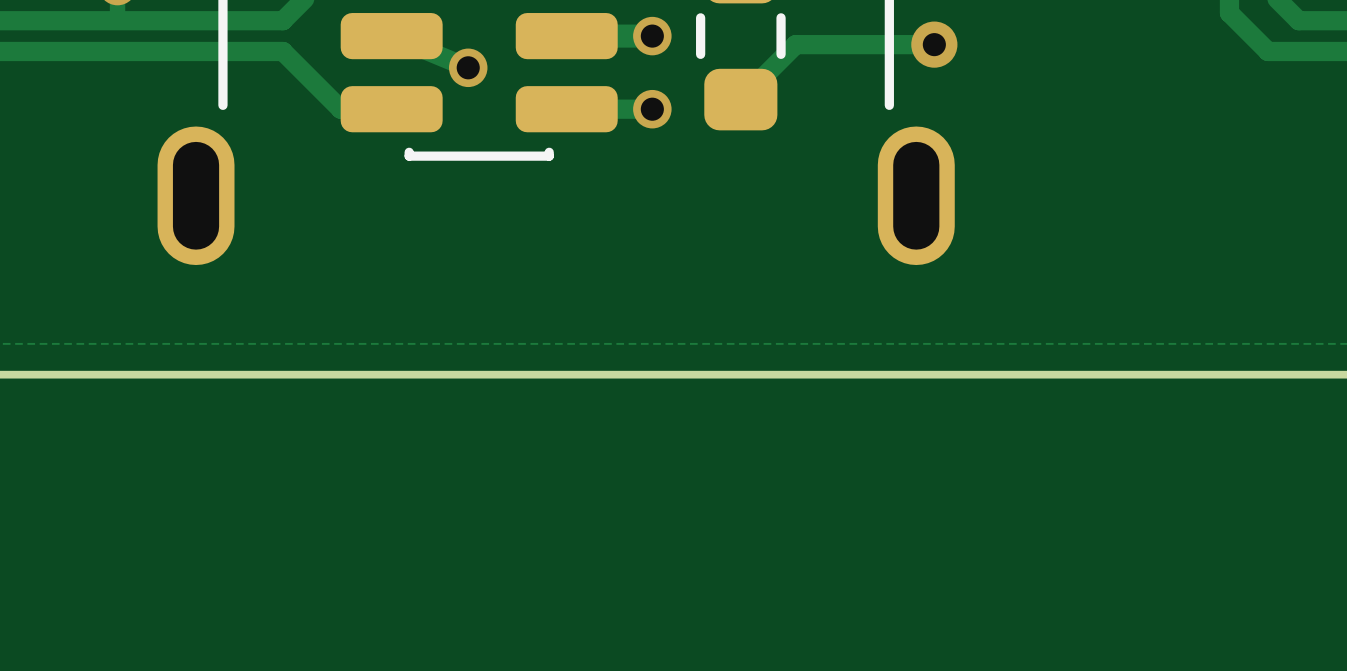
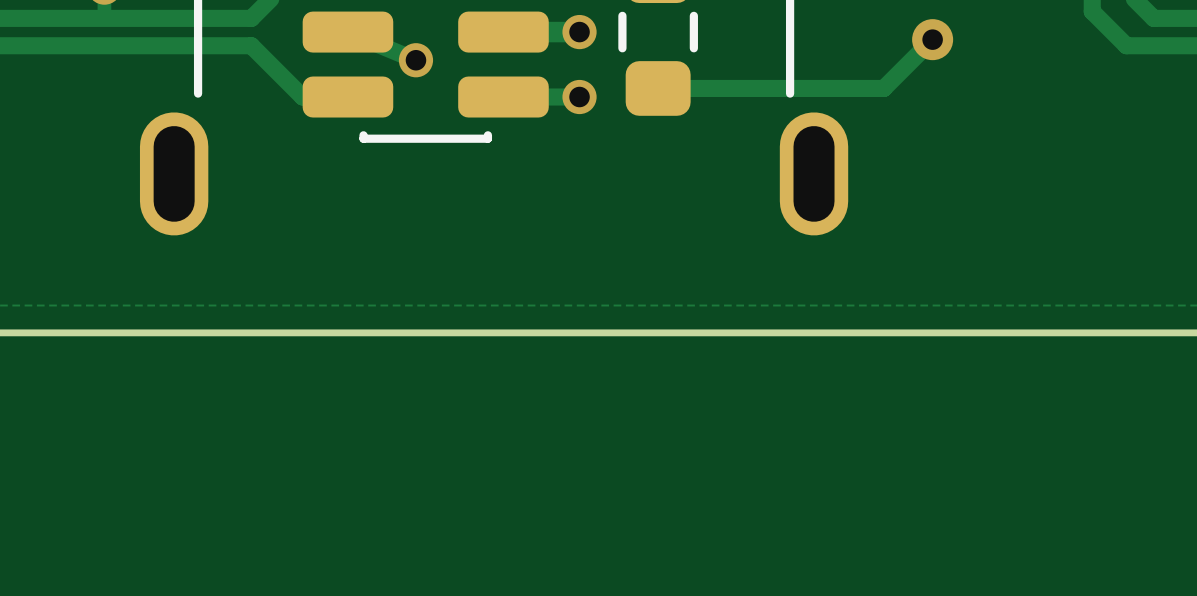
track: (934, 44) (795, 44) (740, 99) -> (932, 39) (883, 88) (658, 88)
via position: (934, 44) -> (932, 39)

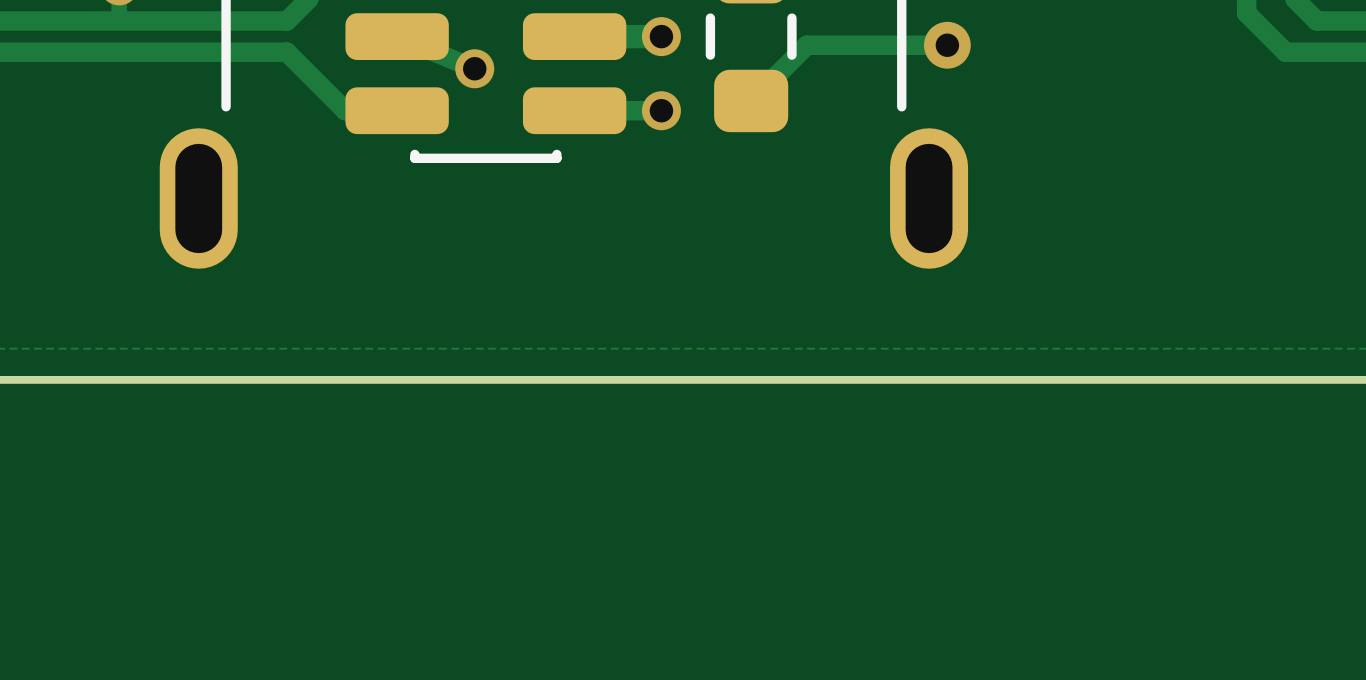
track: (932, 39) (883, 88) (658, 88) -> (947, 45) (806, 45) (751, 100)
via position: (932, 39) -> (947, 45)

